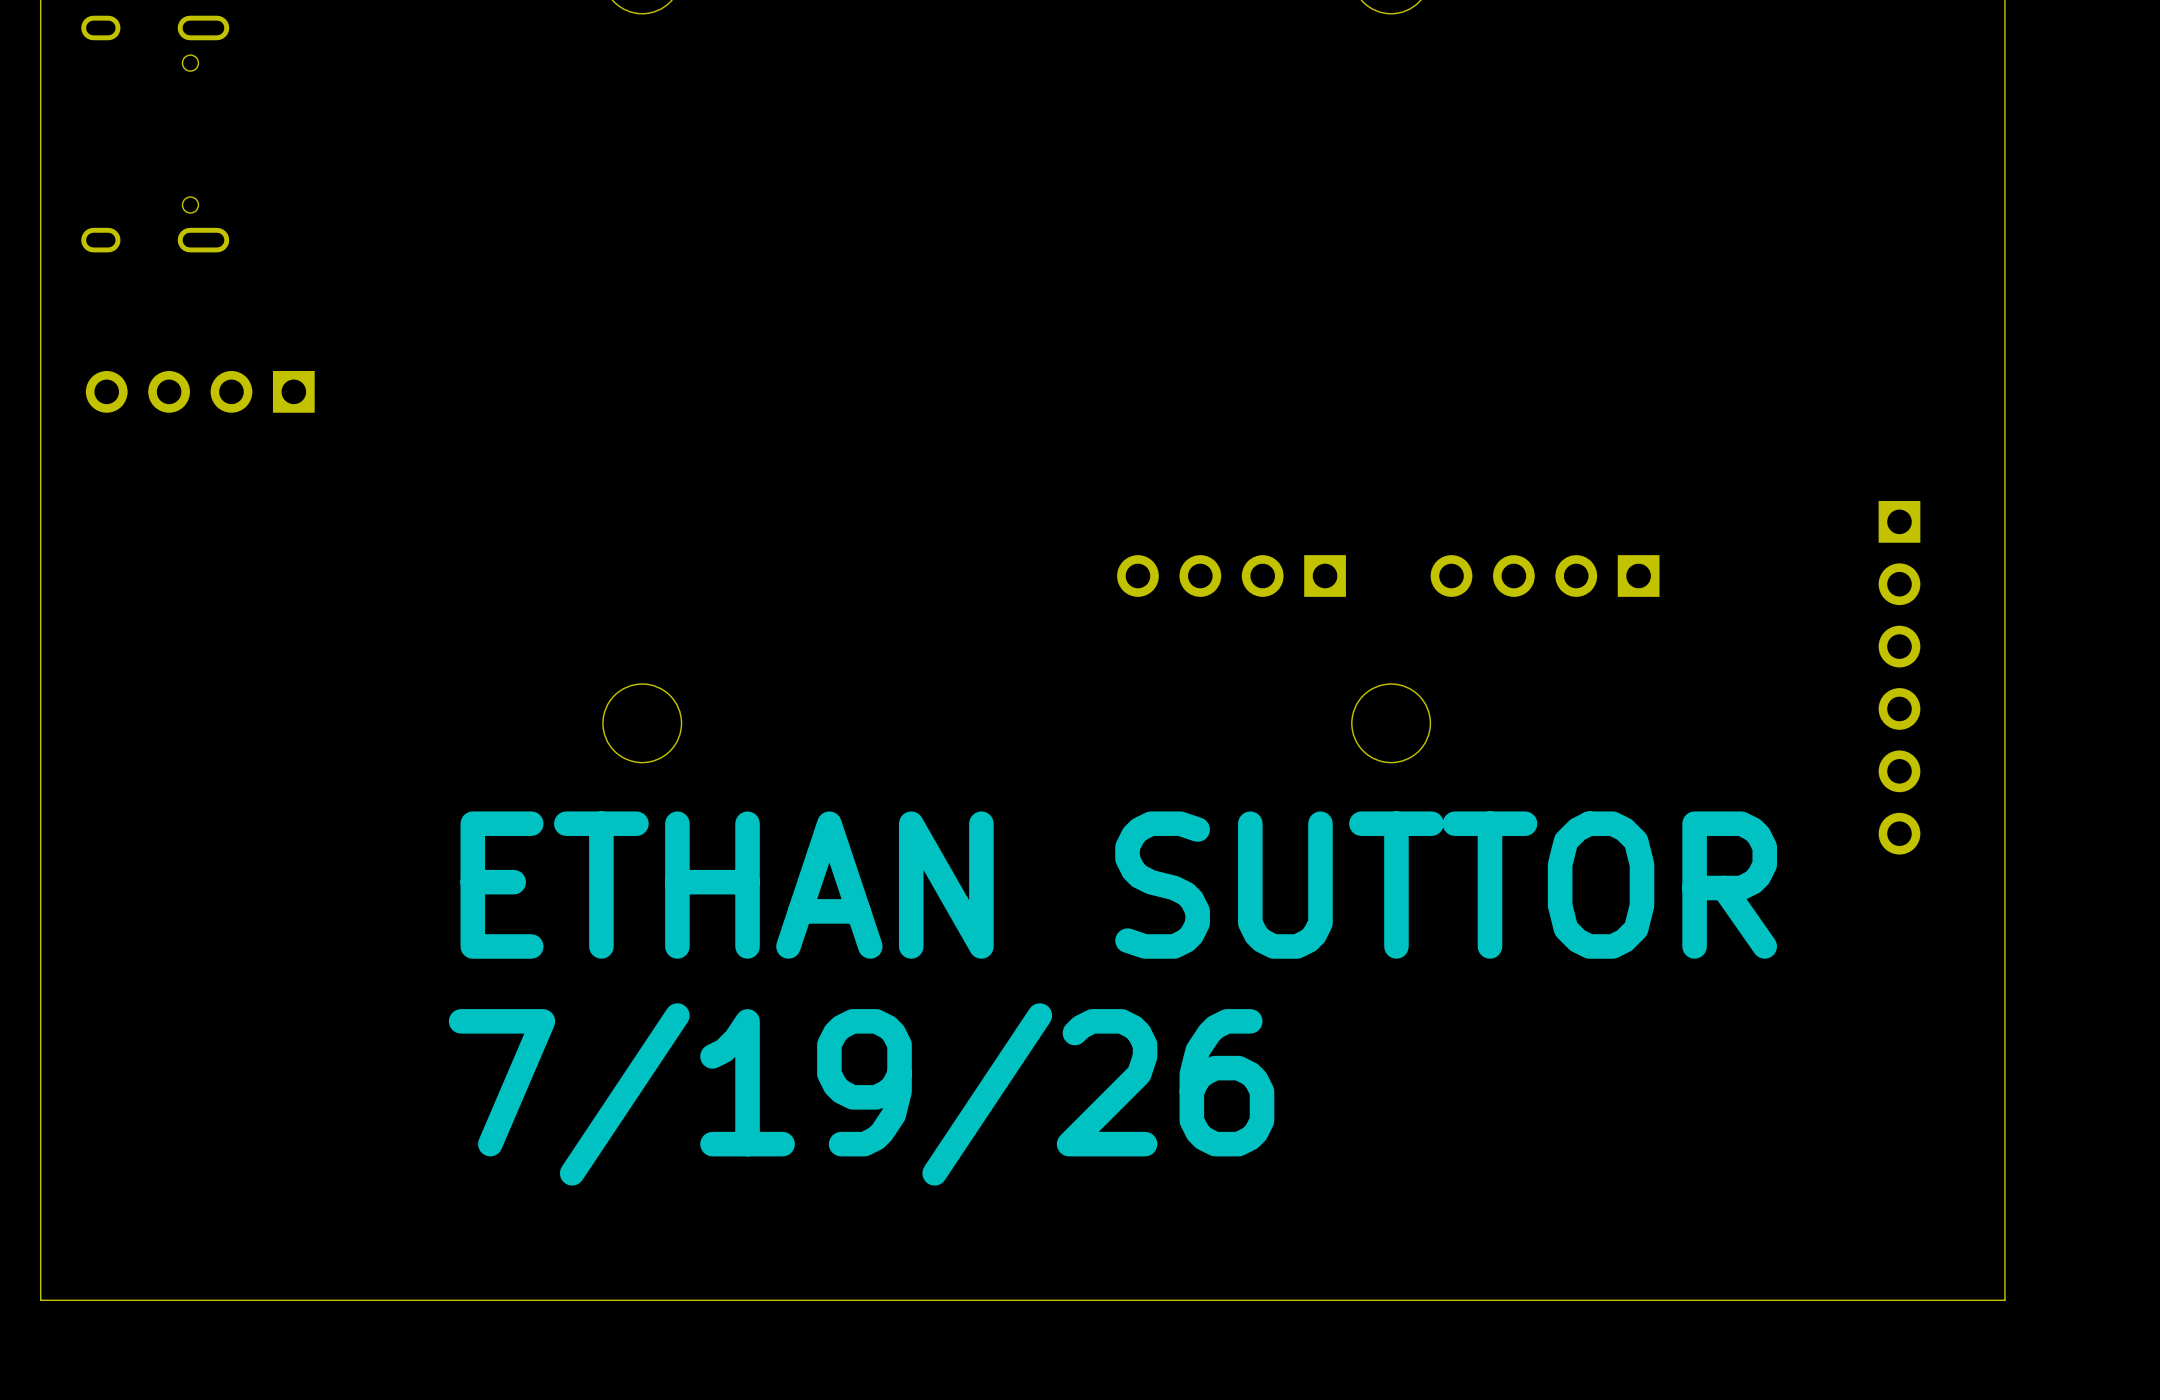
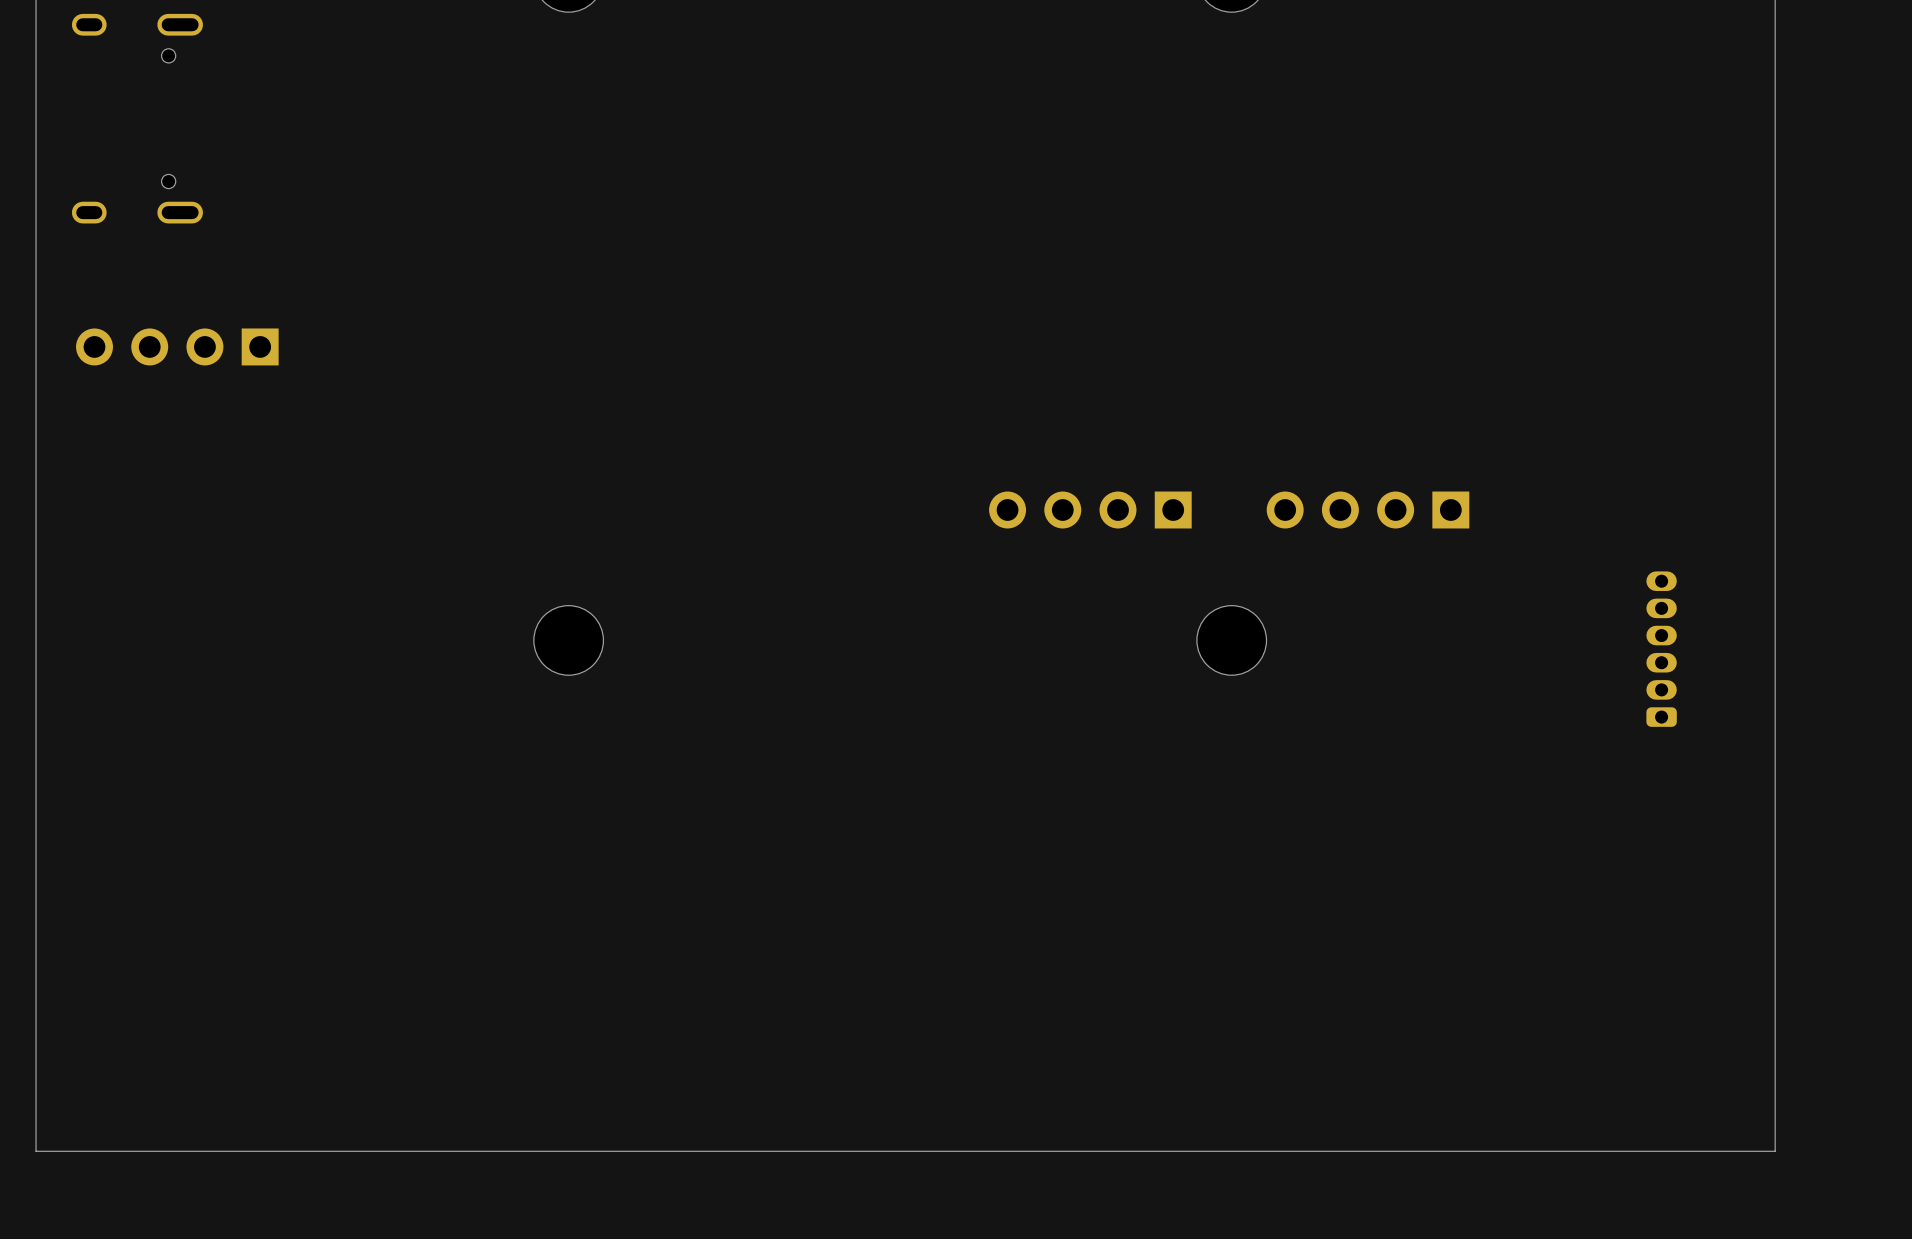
part: (1899, 677) -> none
part: none -> (1661, 649)
text: ETHAN SUTTOR (1118, 885) -> none
text: 7/19/26 (861, 1094) -> none

